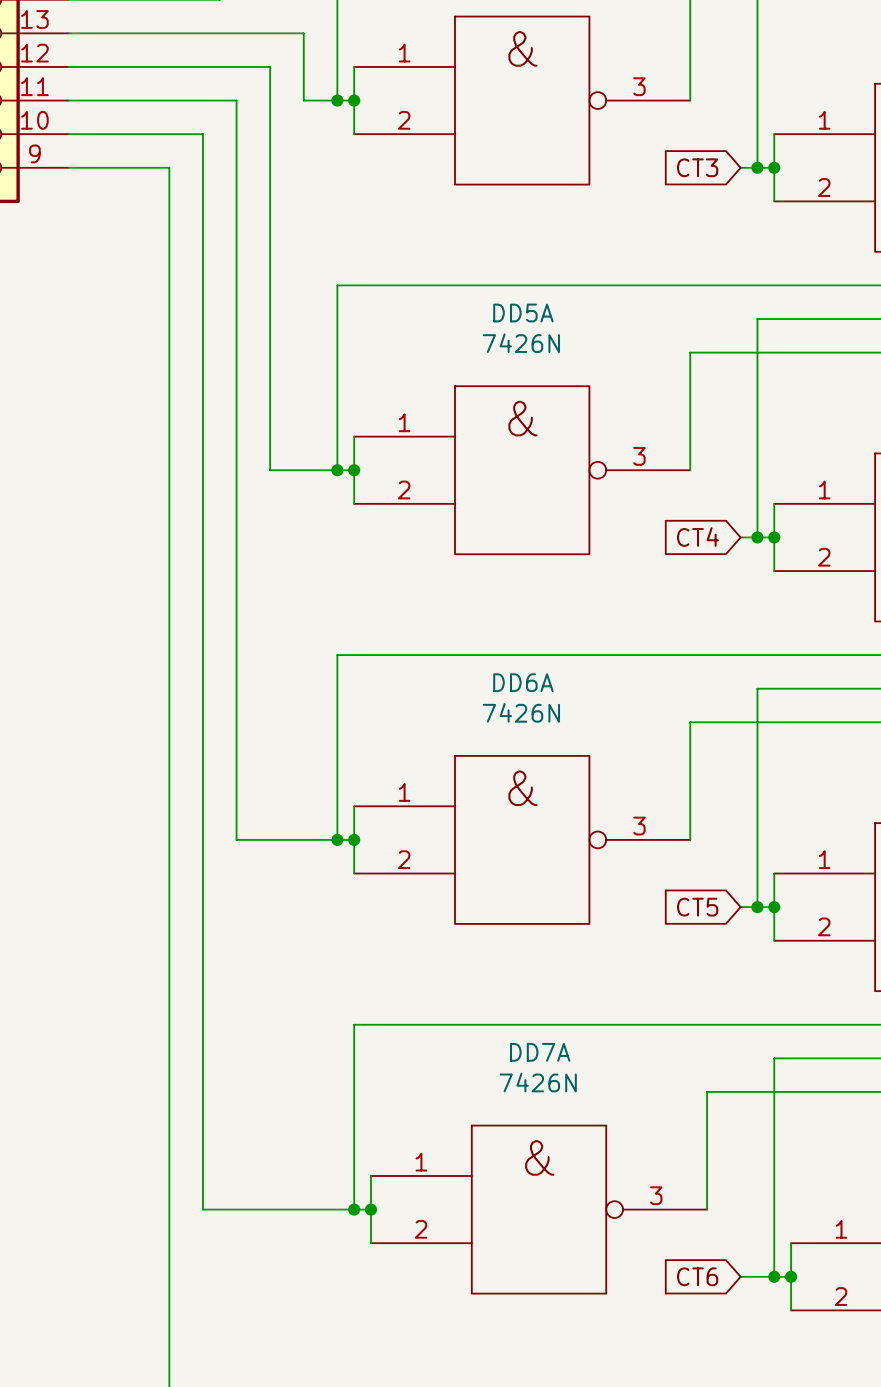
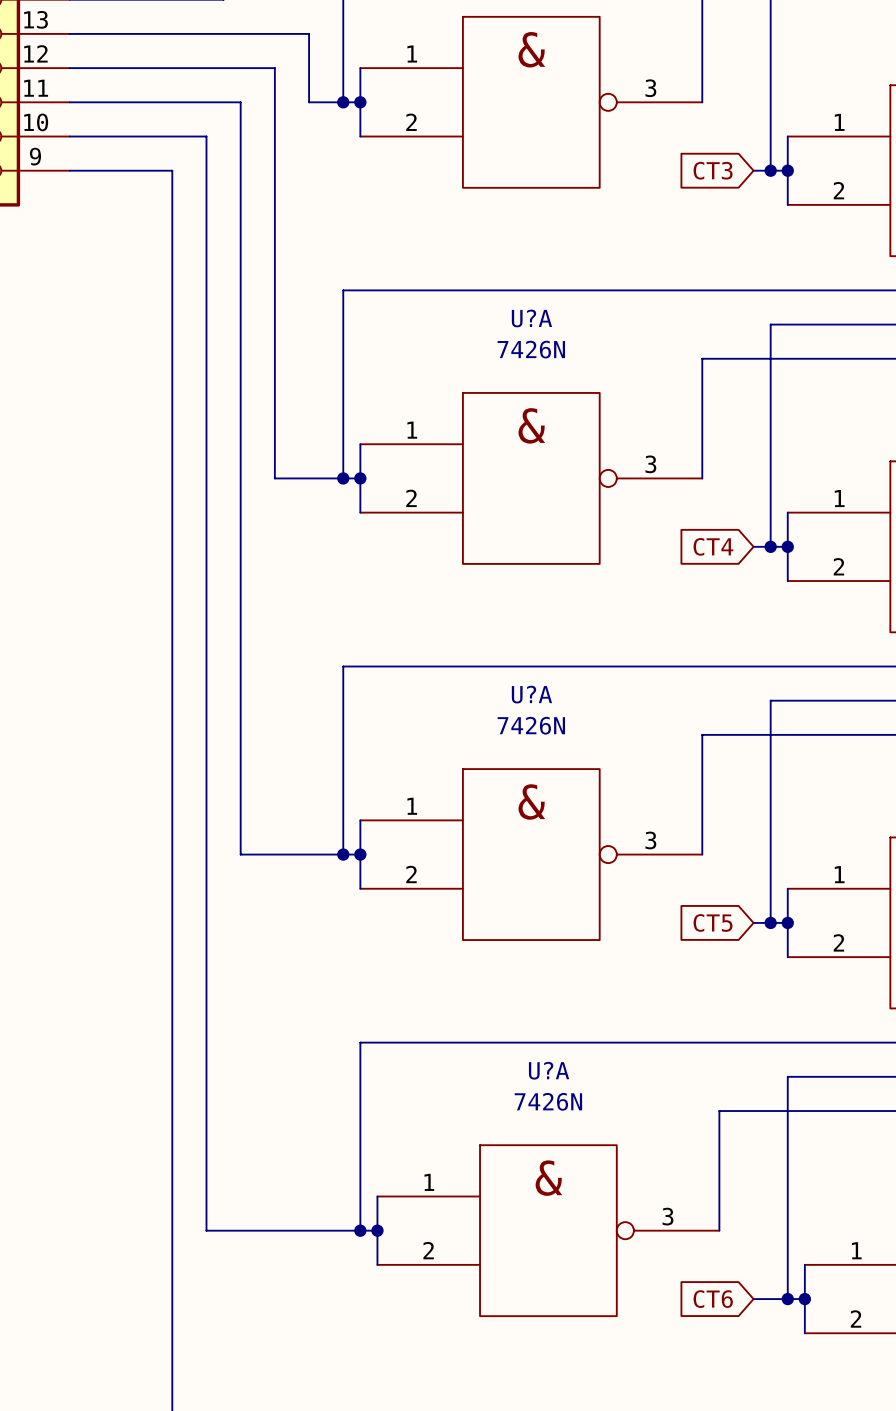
DD5A name: DD5A (523, 313) -> U?A (531, 318)
DD6A name: DD6A (523, 682) -> U?A (531, 694)
DD7A name: DD7A (540, 1052) -> U?A (549, 1070)

